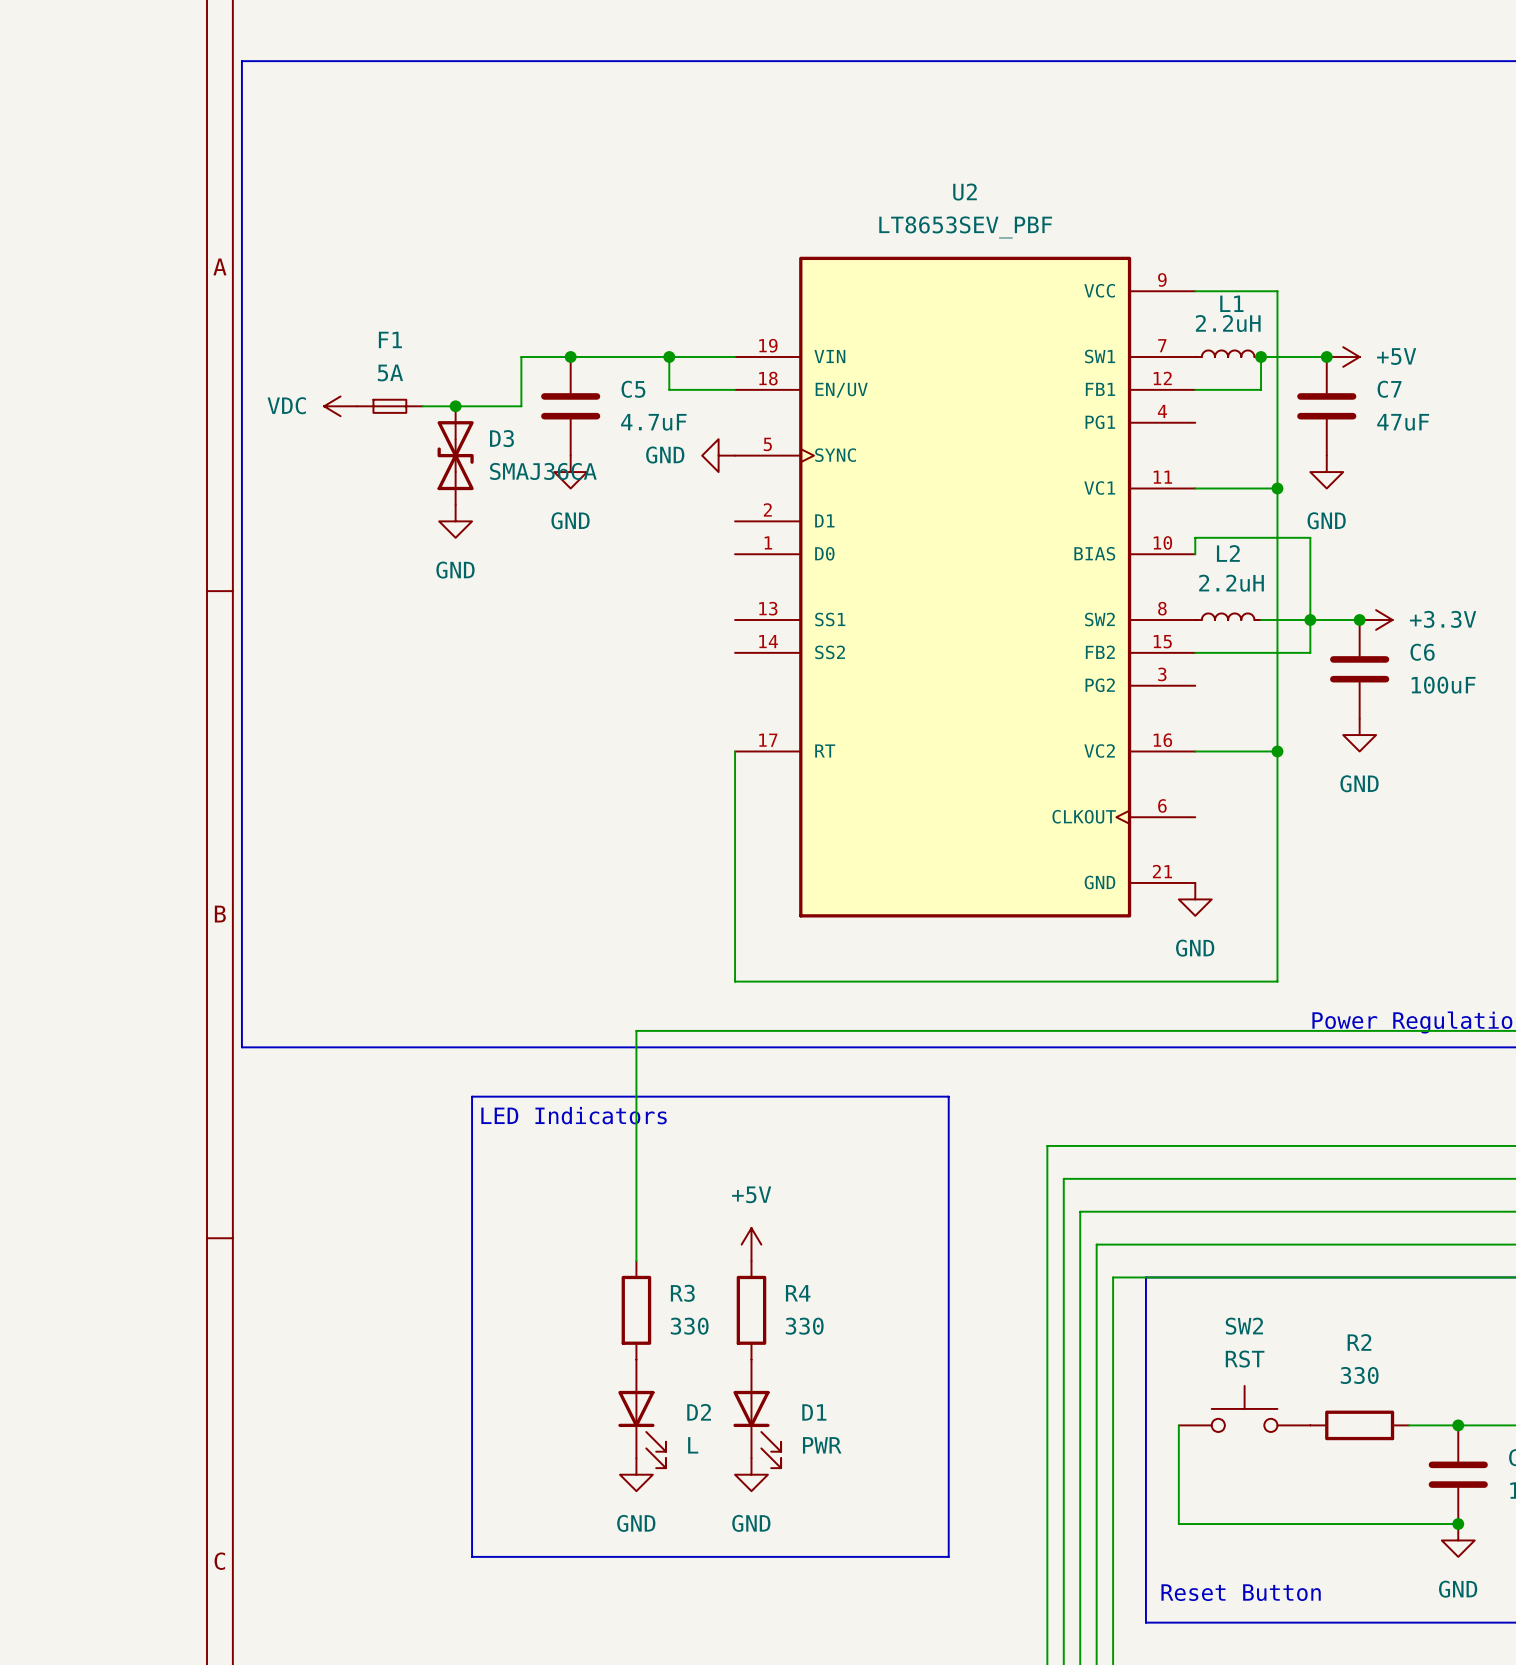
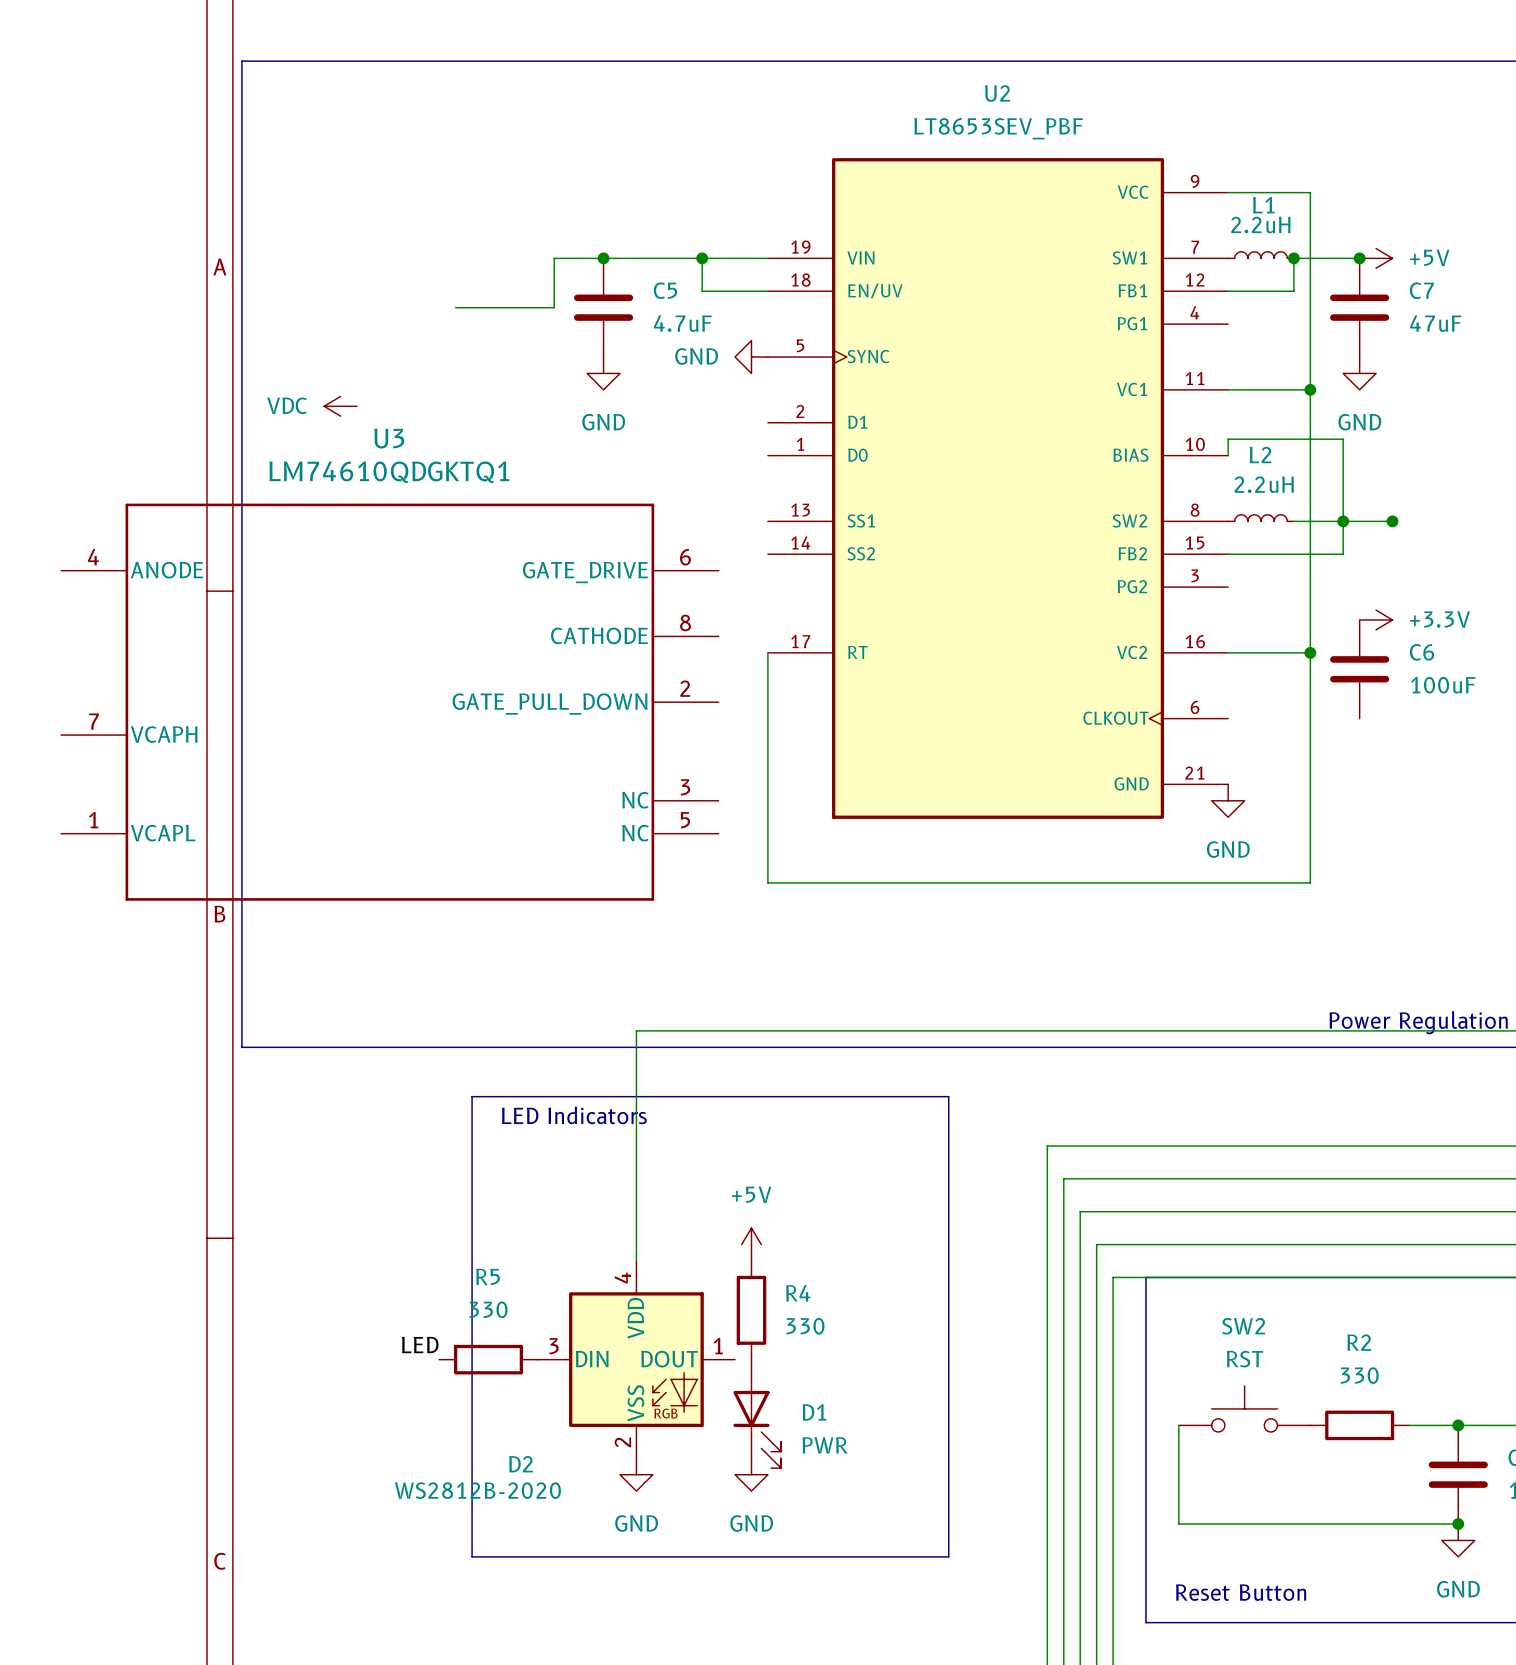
junction: none -> (603, 258)
junction: none -> (702, 258)
junction: none -> (1293, 258)
junction: none -> (1359, 258)
wire: (1277, 291) (1277, 981) (735, 981) (735, 751) -> (1277, 291) (1293, 291) (1293, 258) (1359, 258)
L1 position: (1228, 353) -> (1261, 255)
junction: (570, 357) -> none
wire: (669, 357) (669, 389) (735, 389) -> (702, 258) (702, 291) (767, 291)
junction: (669, 357) -> none
wire: (735, 357) (521, 357) (521, 406) (422, 406) -> (767, 258) (554, 258) (554, 307) (455, 307)
power symbol: none -> GND (751, 357)
junction: (1261, 357) -> none
wire: (1326, 357) (1261, 357) (1261, 389) -> (1310, 389) (1261, 389)
junction: (1326, 357) -> none
power symbol position: +5V (1343, 357) -> +5V (1376, 258)
power symbol: none -> GND (603, 373)
junction: none -> (1310, 389)
F1: 5A (389, 406) -> none
junction: (455, 406) -> none
C5 position: (570, 406) -> (603, 307)
C7 position: (1326, 406) -> (1359, 307)
D3: SMAJ36CA (455, 455) -> none
power symbol: GND (718, 455) -> none
wire: none -> (1228, 455) (1228, 439) (1343, 439) (1343, 554) (1228, 554)
power symbol: GND (570, 472) -> none
power symbol position: GND (1326, 472) -> GND (1359, 373)
wire: (1195, 488) (1277, 488) -> none
junction: (1277, 488) -> none
power symbol: GND (455, 521) -> none
junction: none -> (1343, 521)
junction: none -> (1392, 521)
wire: (1310, 537) (1195, 537) (1195, 554) -> (1310, 537) (1310, 192) (1228, 192)
U2 position: (965, 587) -> (998, 488)
L2 position: (1228, 616) -> (1261, 518)
wire: (1261, 619) (1359, 619) -> (1293, 521) (1392, 521)
junction: (1310, 619) -> none
junction: (1359, 619) -> none
wire: none -> (767, 652) (767, 882) (1310, 882) (1310, 652)
junction: none -> (1310, 652)
U3: none -> LM74610QDGKTQ1 (389, 702)
power symbol: GND (1359, 735) -> none
wire: (1195, 751) (1277, 751) -> none
junction: (1277, 751) -> none
power symbol: none -> GND (1228, 800)
power symbol: GND (1195, 899) -> none
R3: 330 (636, 1310) -> none
label: none -> LED (420, 1344)
R5: none -> 330 (488, 1359)
D2 symbol: [618, 1359, 667, 1469] -> [537, 1261, 736, 1459]
D2 name position: D2 (699, 1412) -> D2 (520, 1464)
D2 value: L (693, 1445) -> WS2812B-2020 (477, 1490)

